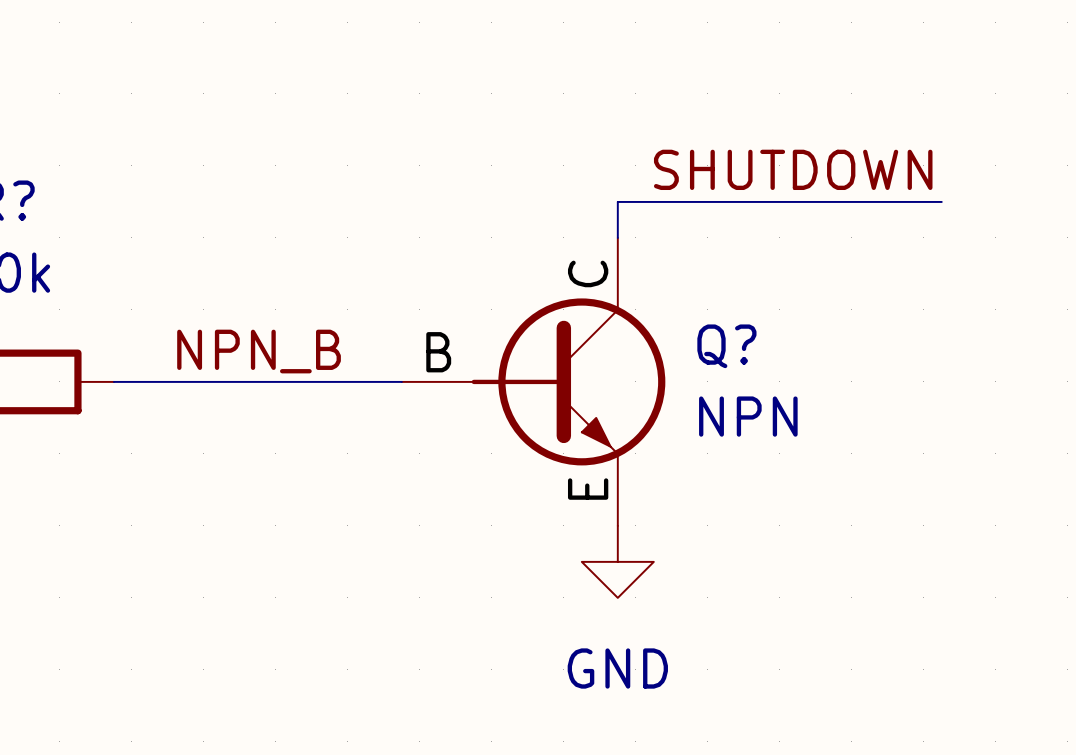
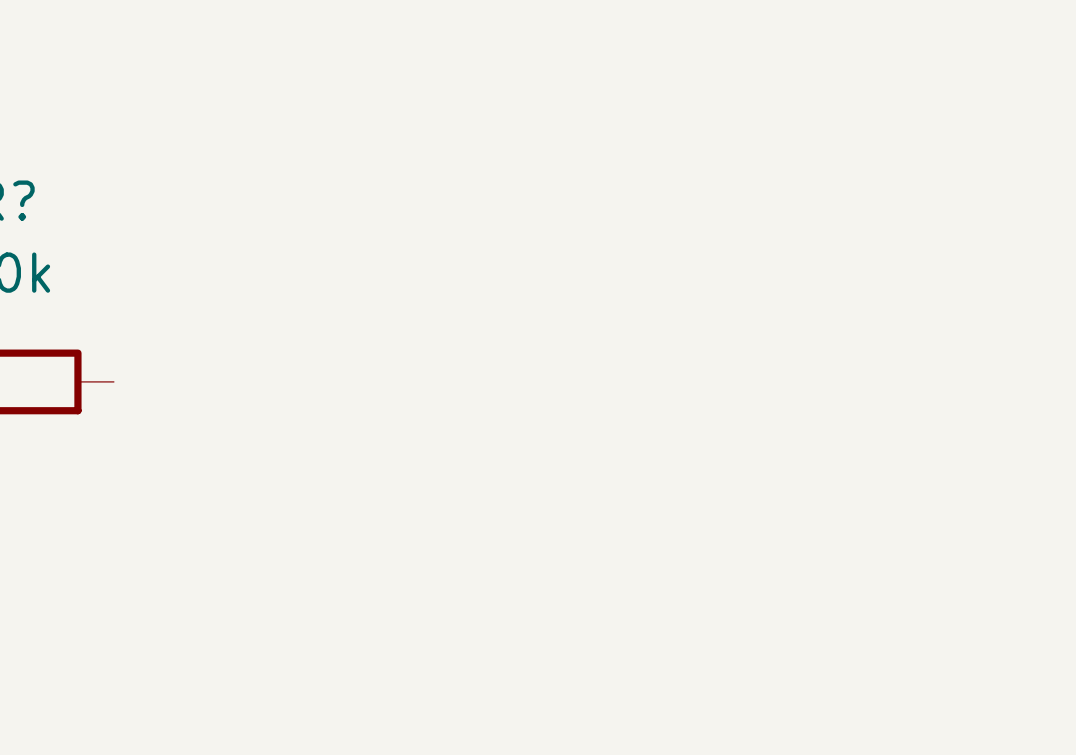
label: SHUTDOWN (793, 169) -> none
wire: (941, 201) (617, 201) (617, 237) -> none
label: NPN_B (259, 351) -> none
wire: (113, 381) (401, 381) -> none
Q?: NPN (533, 381) -> none
power symbol: GND (617, 561) -> none

